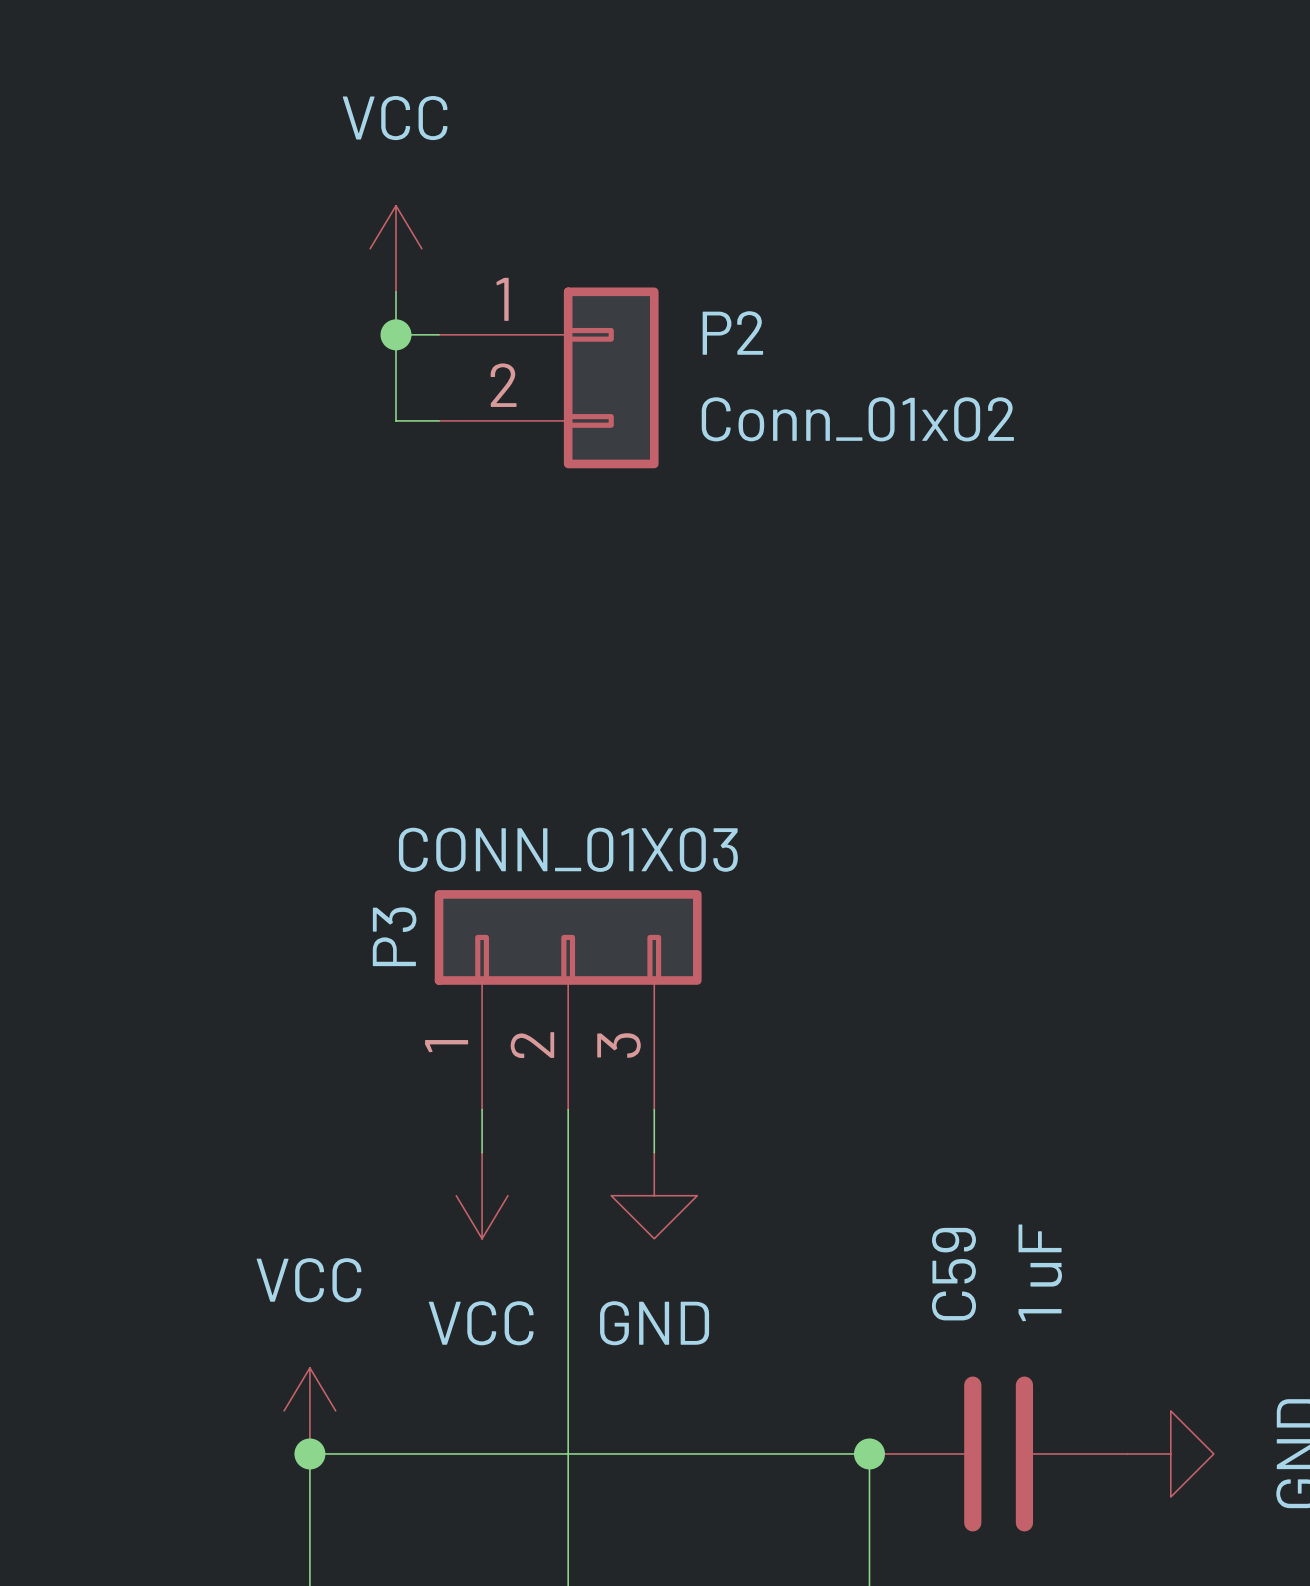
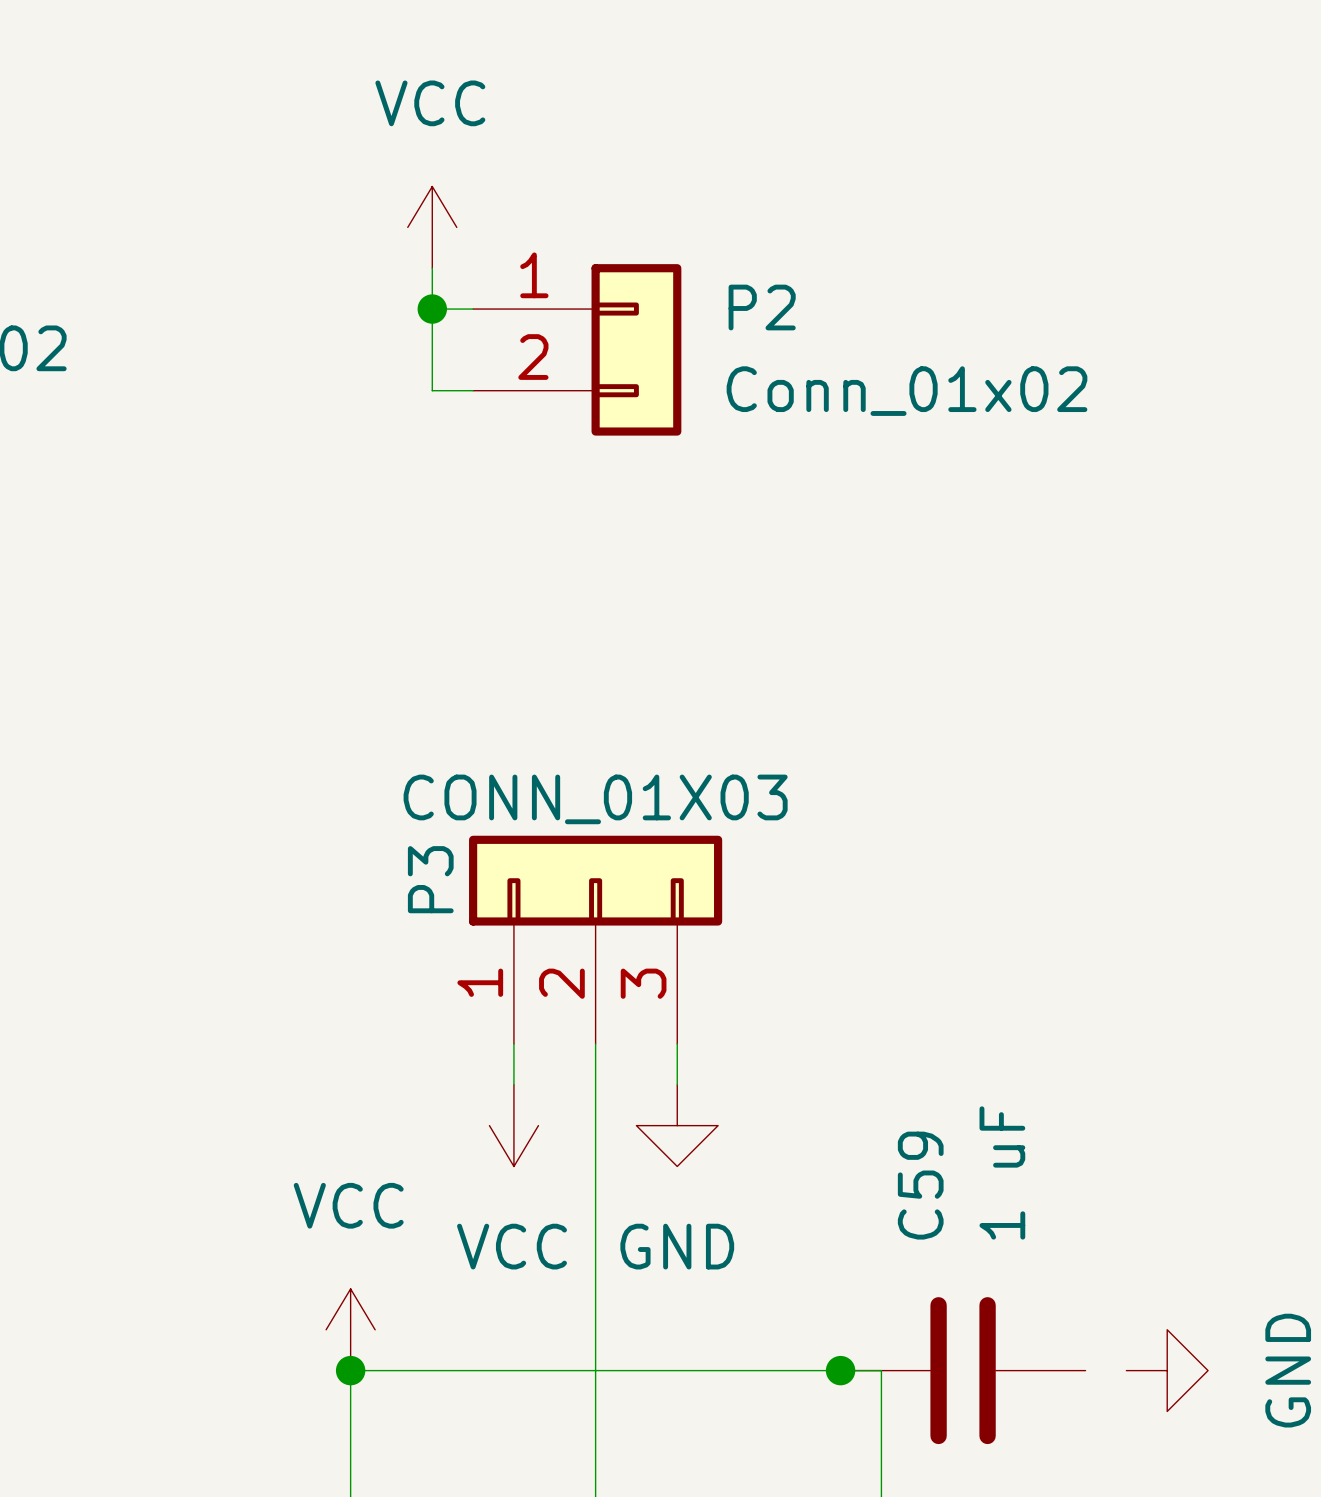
junction position: (869, 1453) -> (840, 1370)
C59 position: (998, 1453) -> (963, 1370)

